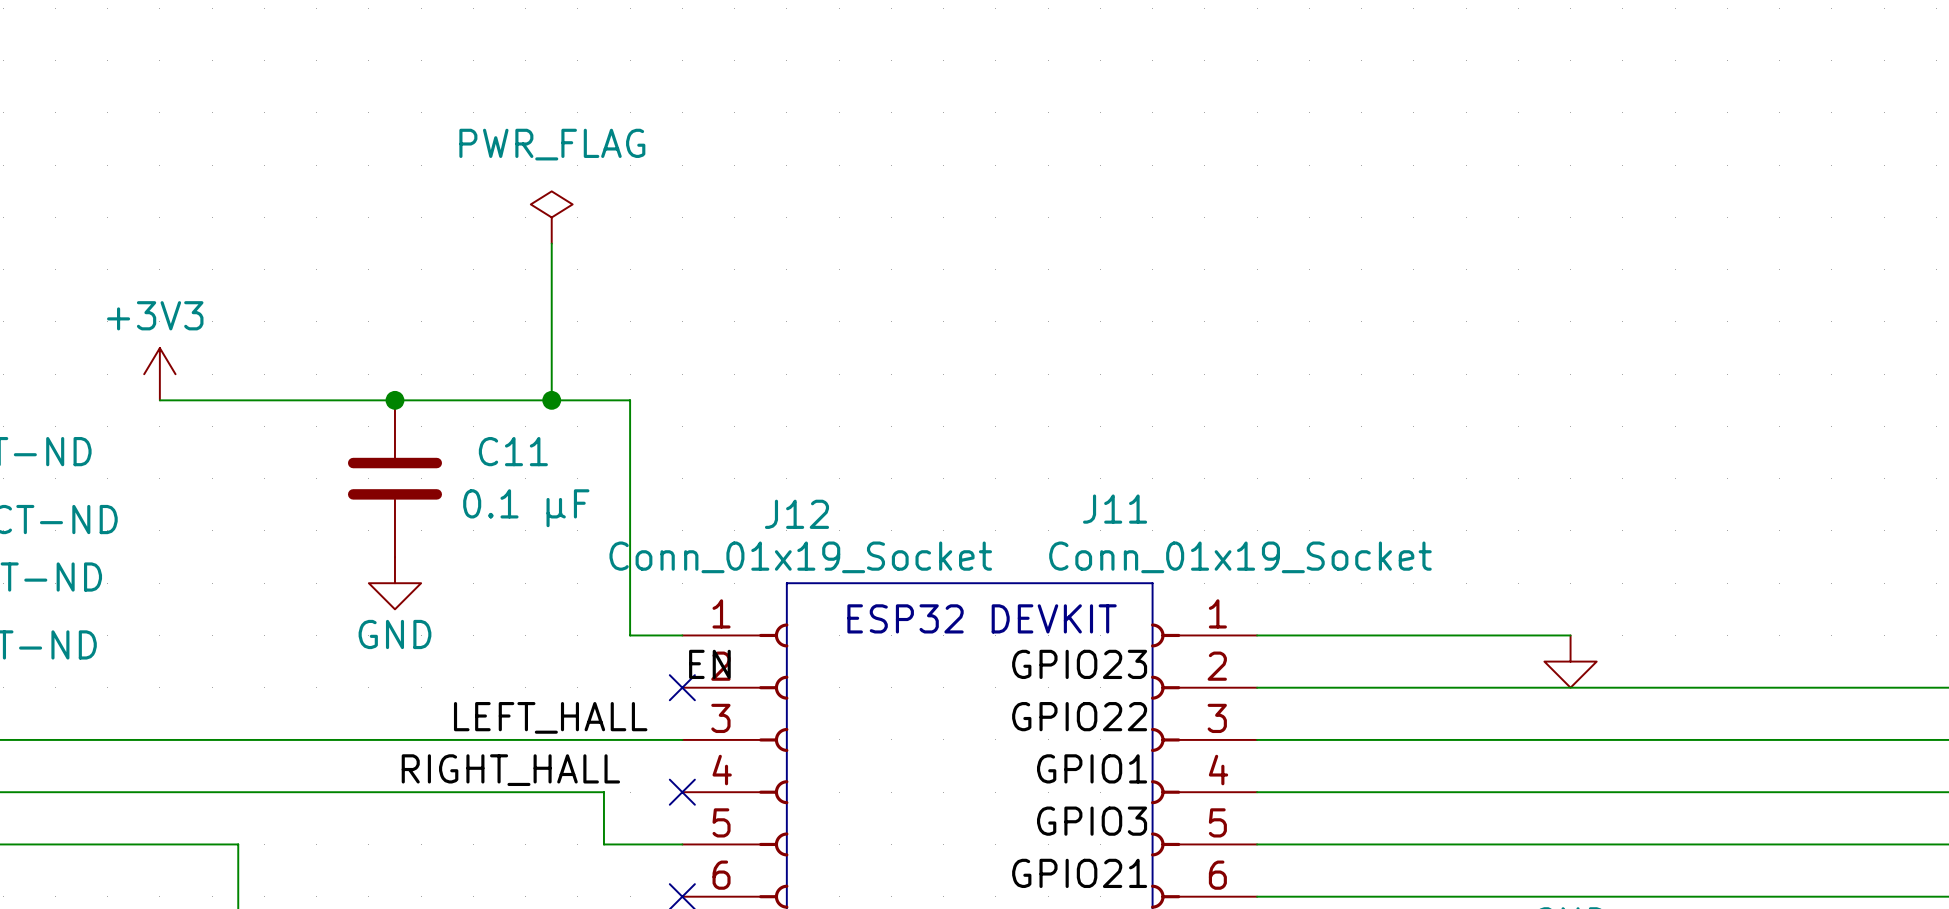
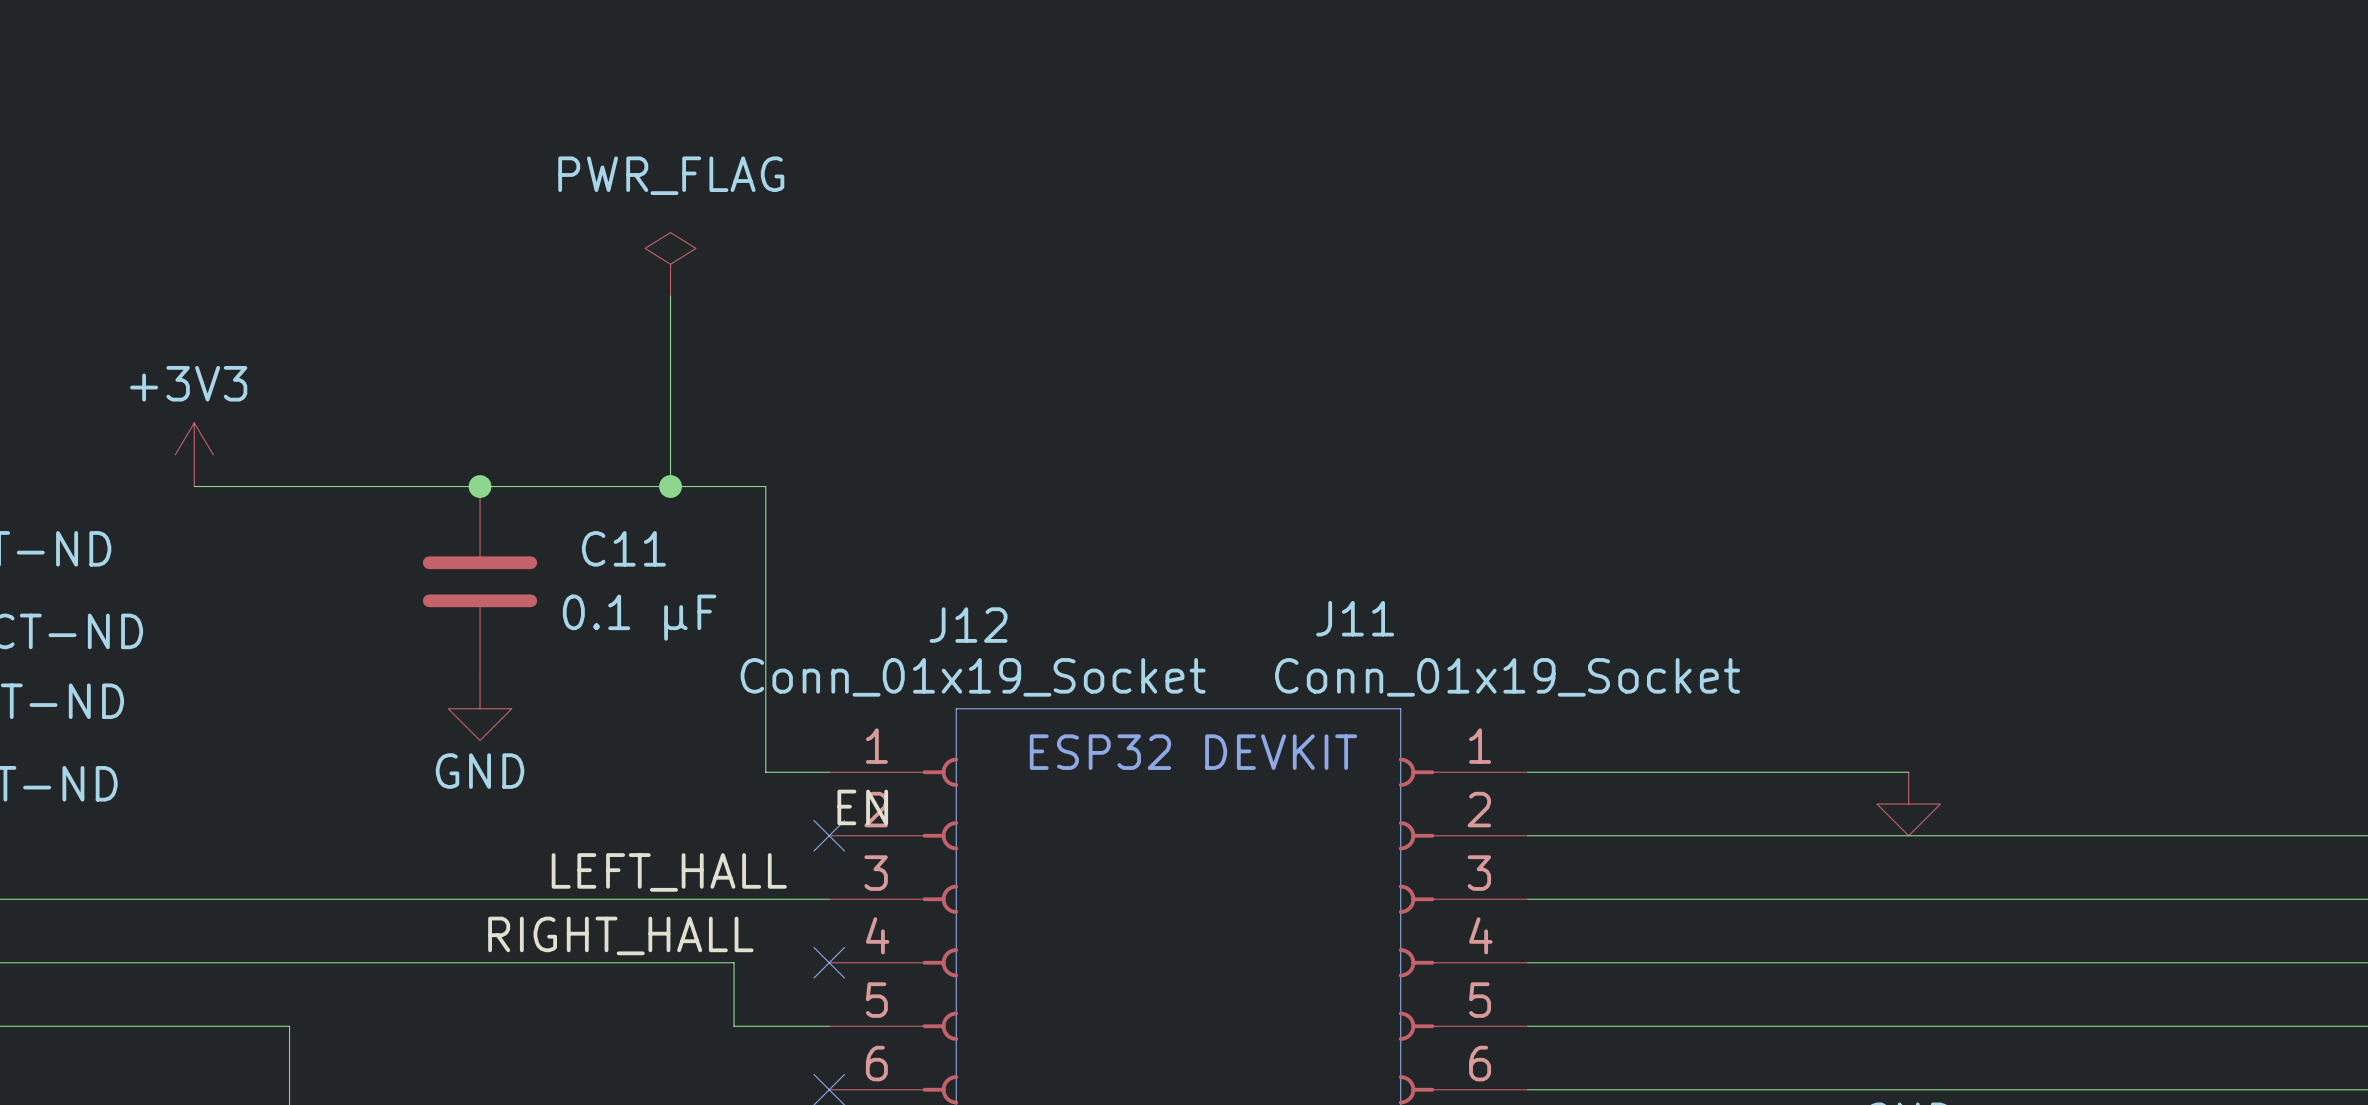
label: GPIO23 (1079, 664) -> none
label: GPIO22 (1079, 716) -> none
label: GPIO1 (1092, 768) -> none
label: GPIO3 (1092, 821) -> none
label: GPIO21 (1079, 873) -> none

